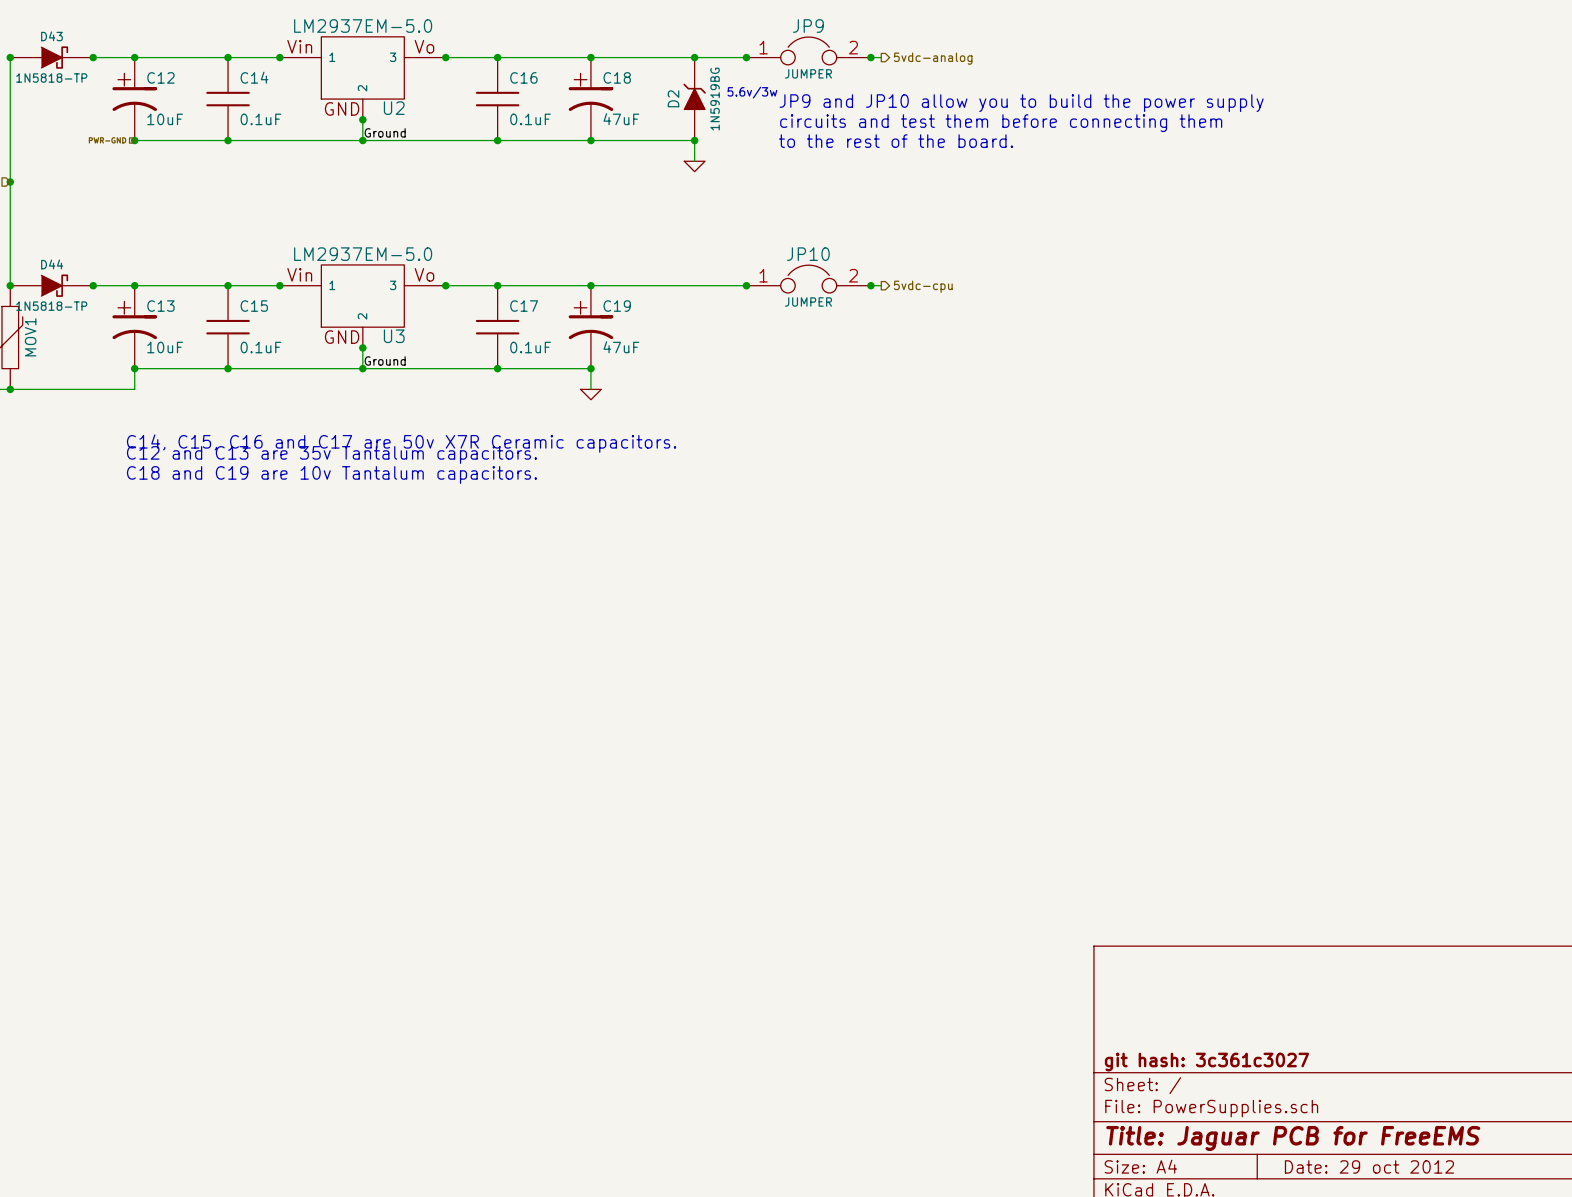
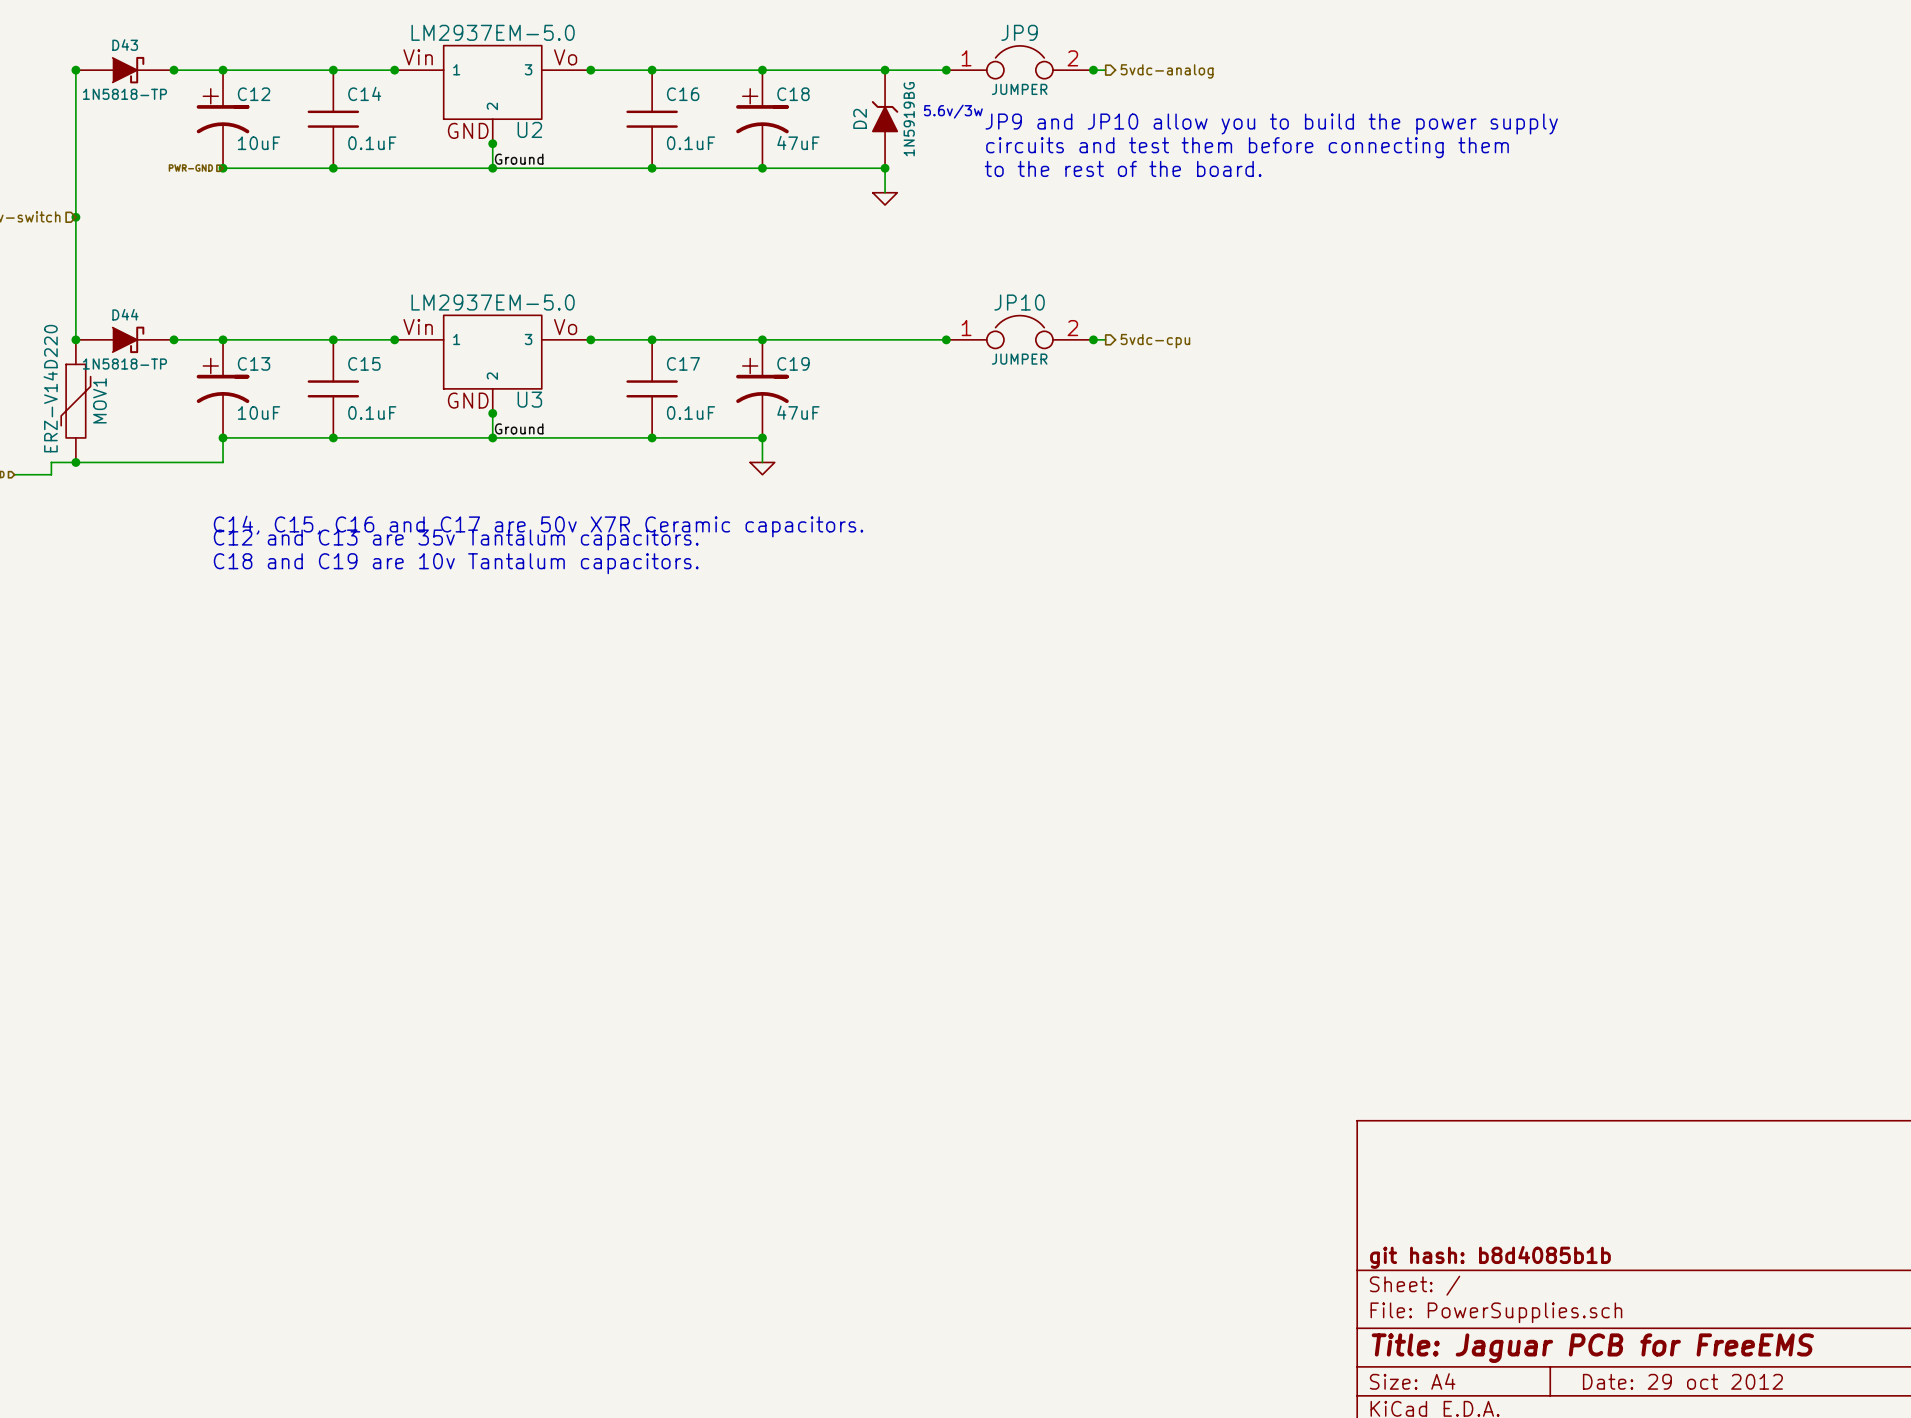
title block: git hash: 3c361c3027 (1206, 1062) -> git hash: b8d4085b1b (1490, 1257)

